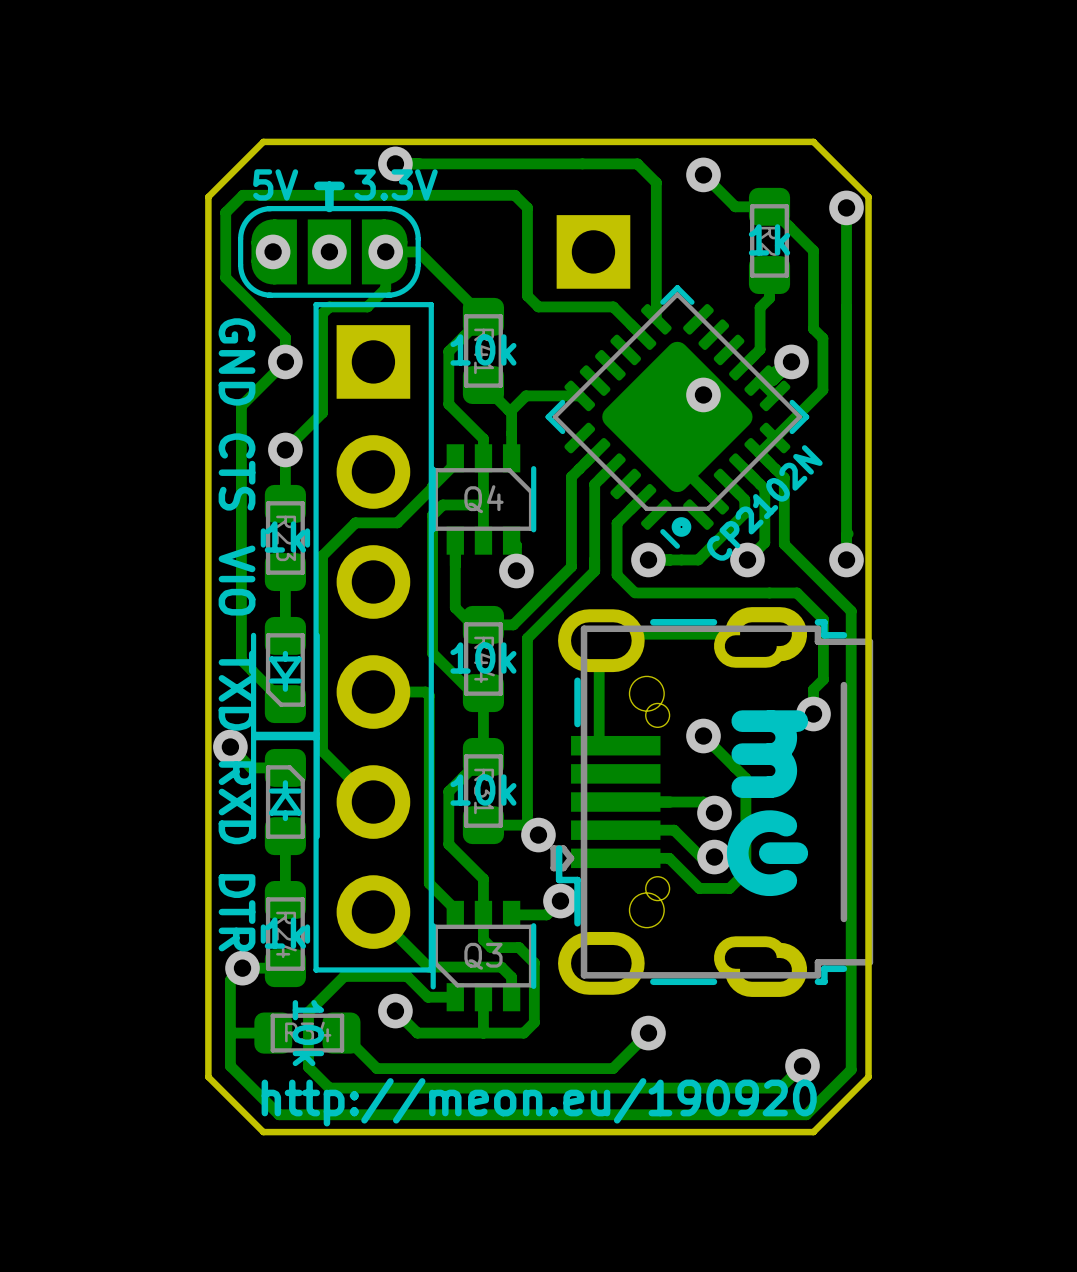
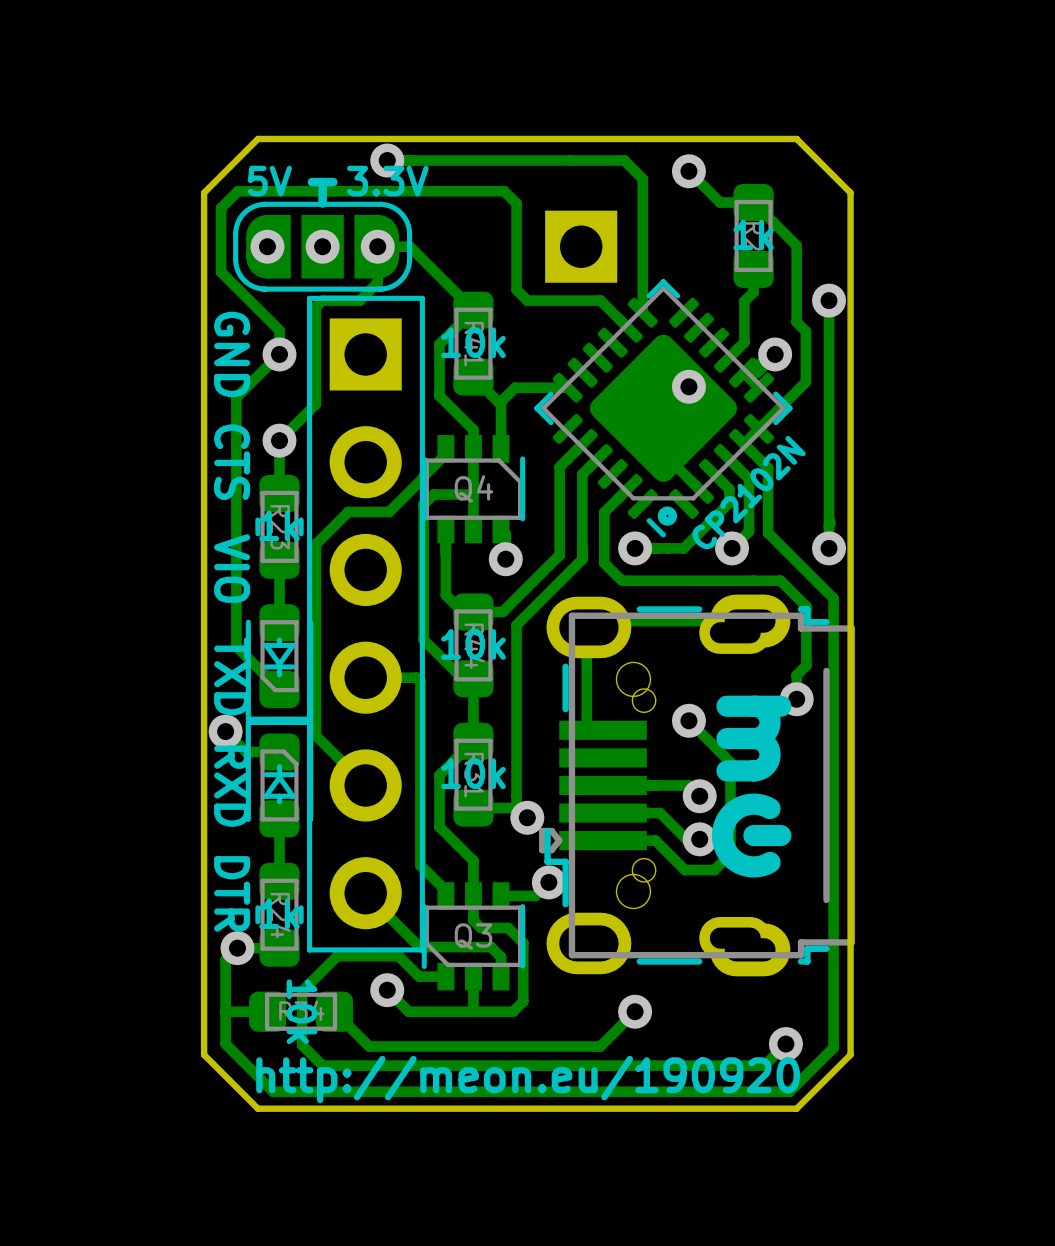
track: (846, 207) (846, 306) -> none
via position: (846, 207) -> (829, 300)

